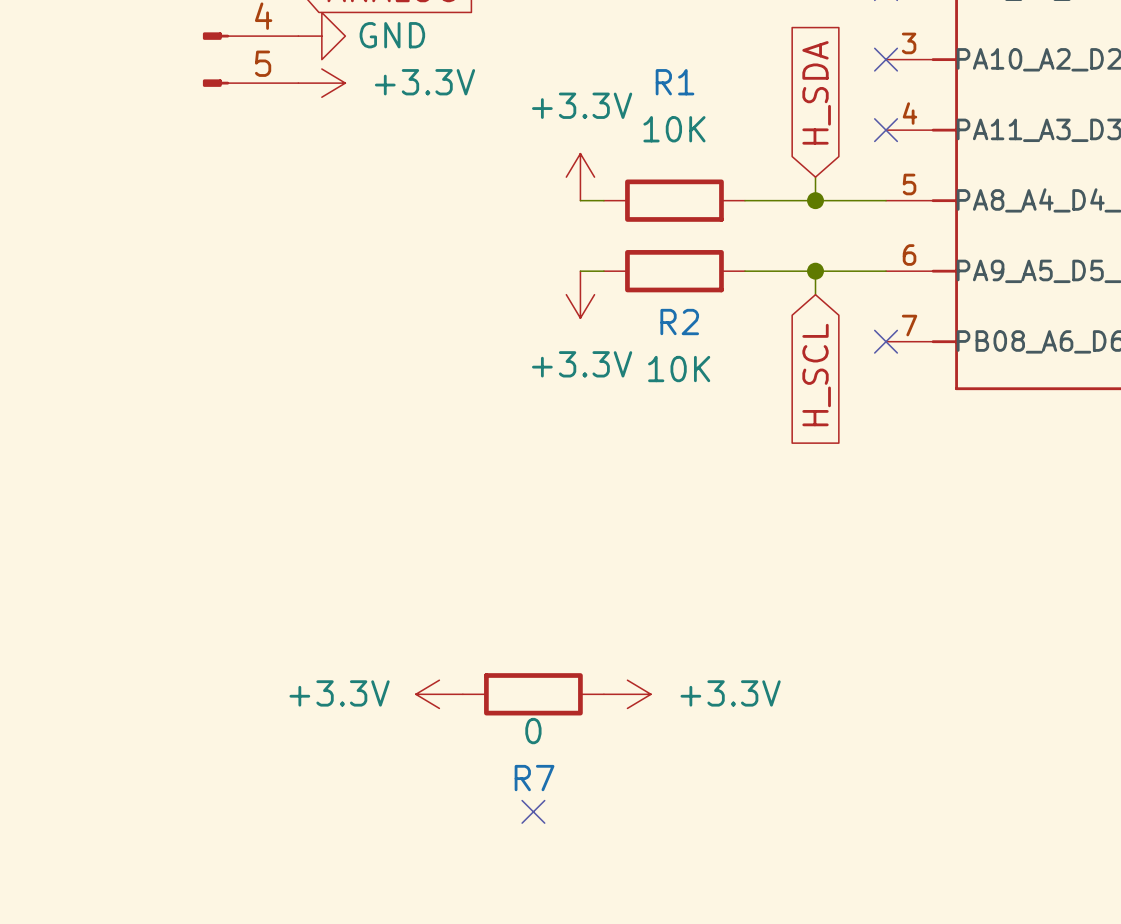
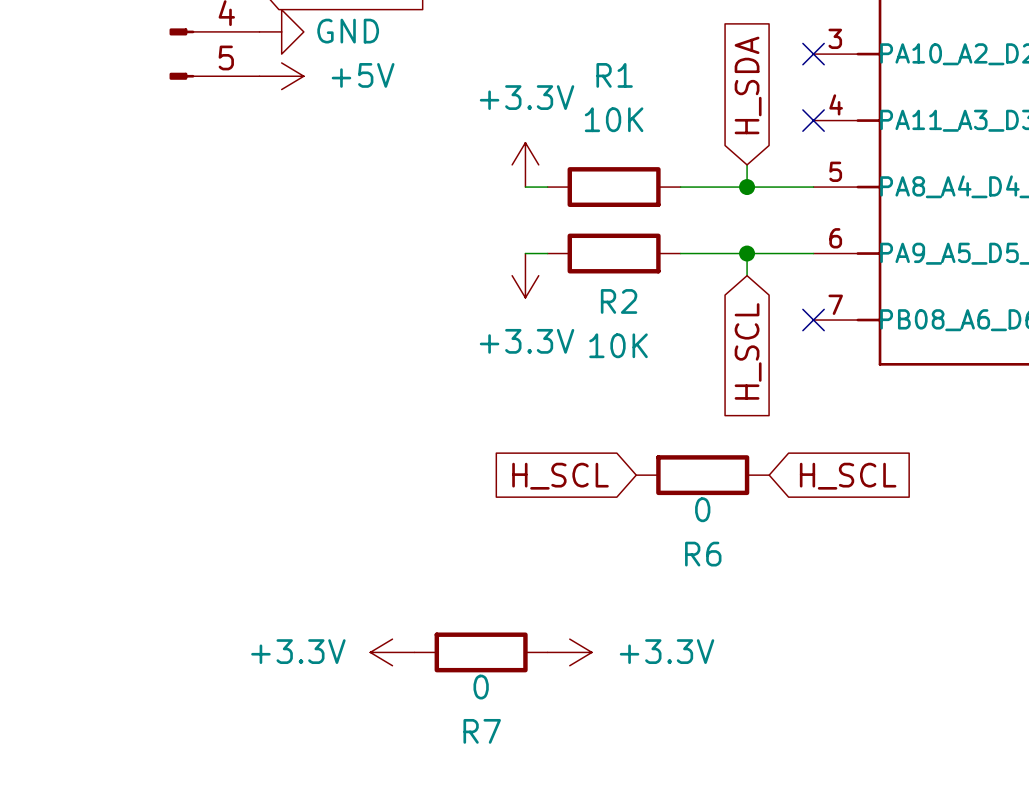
power symbol: +3.3V (321, 83) -> +5V (281, 76)
R6: none -> 0 (702, 475)
global label: none -> H_SCL (560, 476)
global label: none -> H_SCL (848, 476)
no-connect mark: (533, 811) -> none

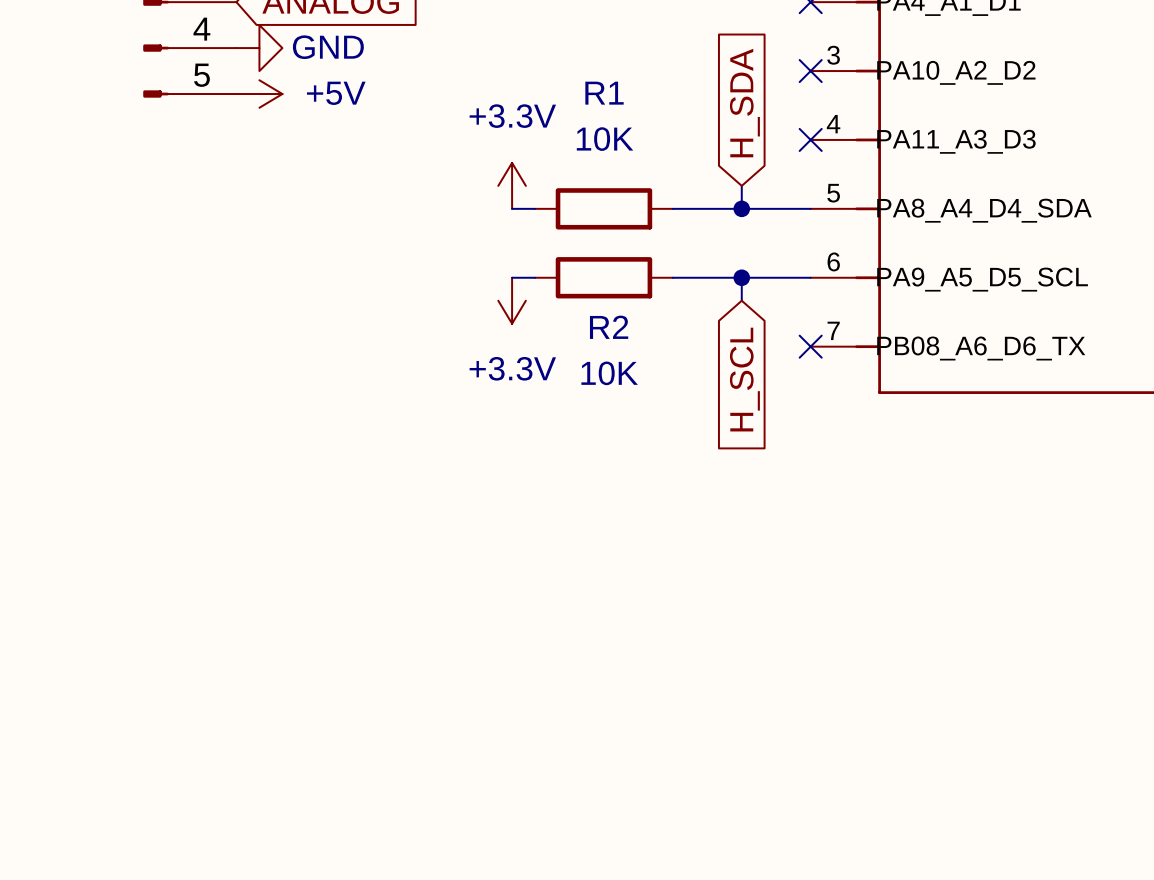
R6: 0 (702, 475) -> none
global label: H_SCL (560, 476) -> none
global label: H_SCL (848, 476) -> none
power symbol: +3.3V (392, 652) -> none
R7: 0 (481, 652) -> none
power symbol: +3.3V (569, 652) -> none

